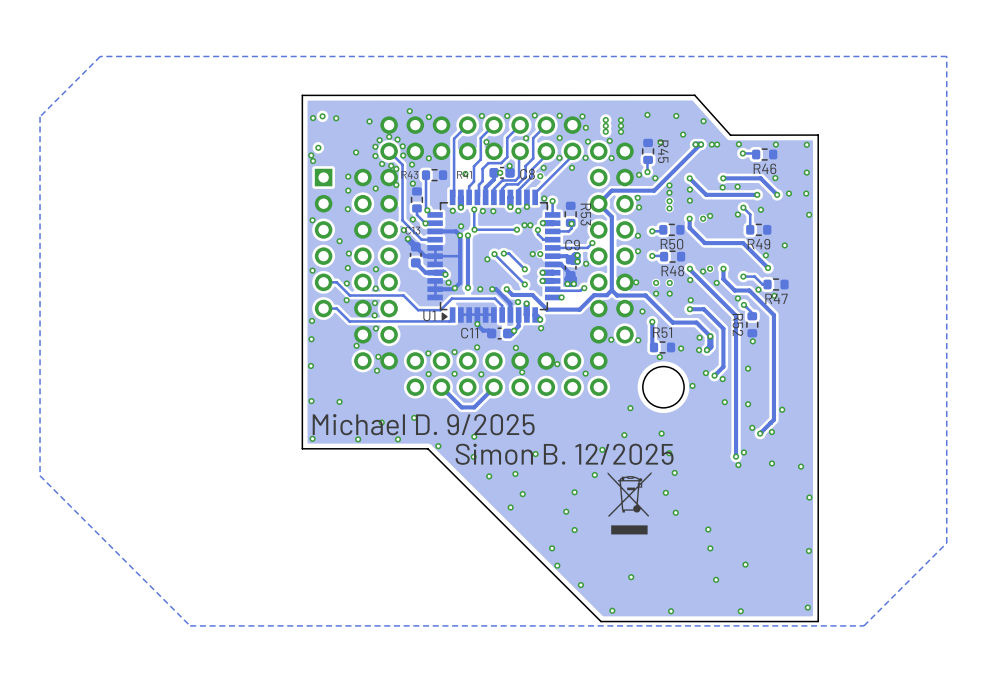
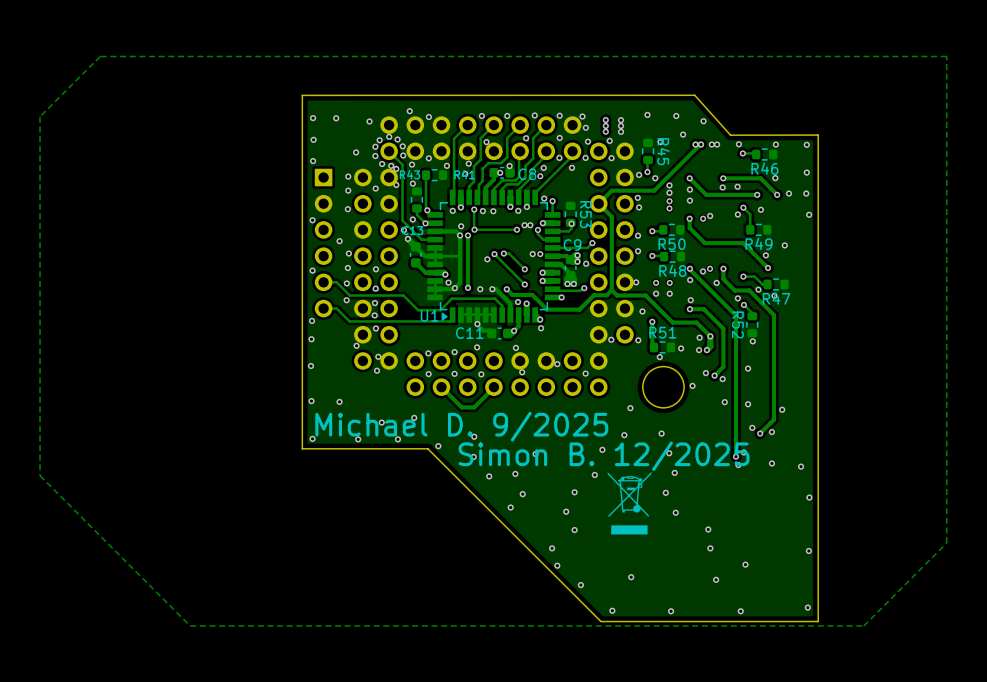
via: (322, 116) -> none
via: none -> (313, 139)
via: (318, 147) -> none
via: (311, 155) -> none
via: none -> (468, 163)
via: none -> (446, 165)

